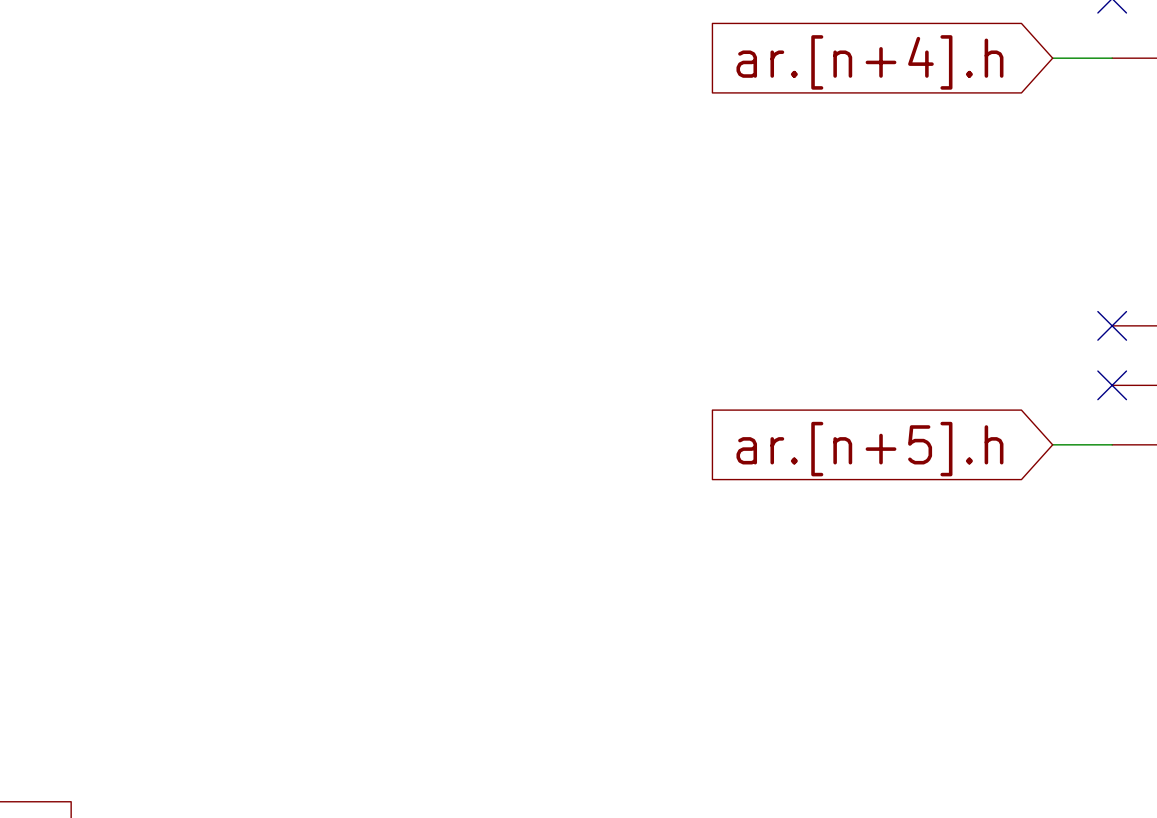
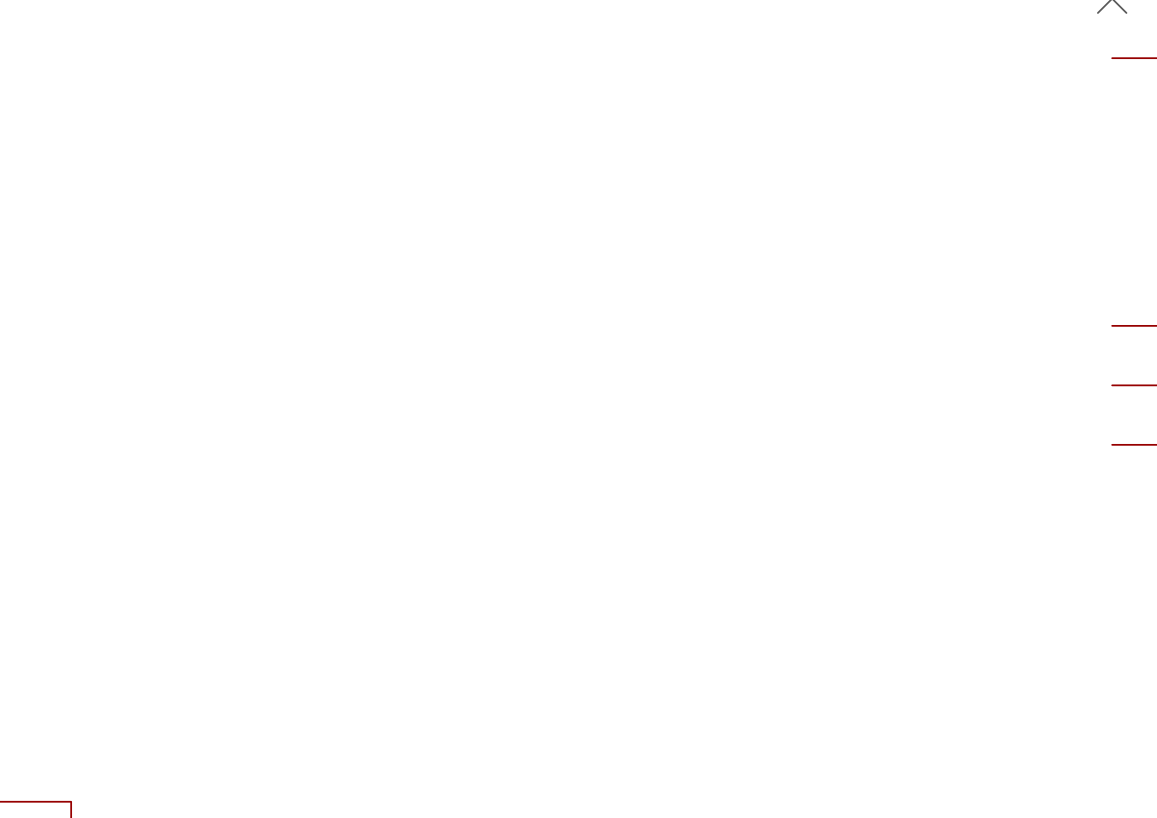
wire: (1052, 58) (1112, 58) -> none
global label: ar.[n+4].h (869, 62) -> none
no-connect mark: (1112, 325) -> none
no-connect mark: (1112, 385) -> none
wire: (1052, 444) (1112, 444) -> none
global label: ar.[n+5].h (869, 449) -> none

